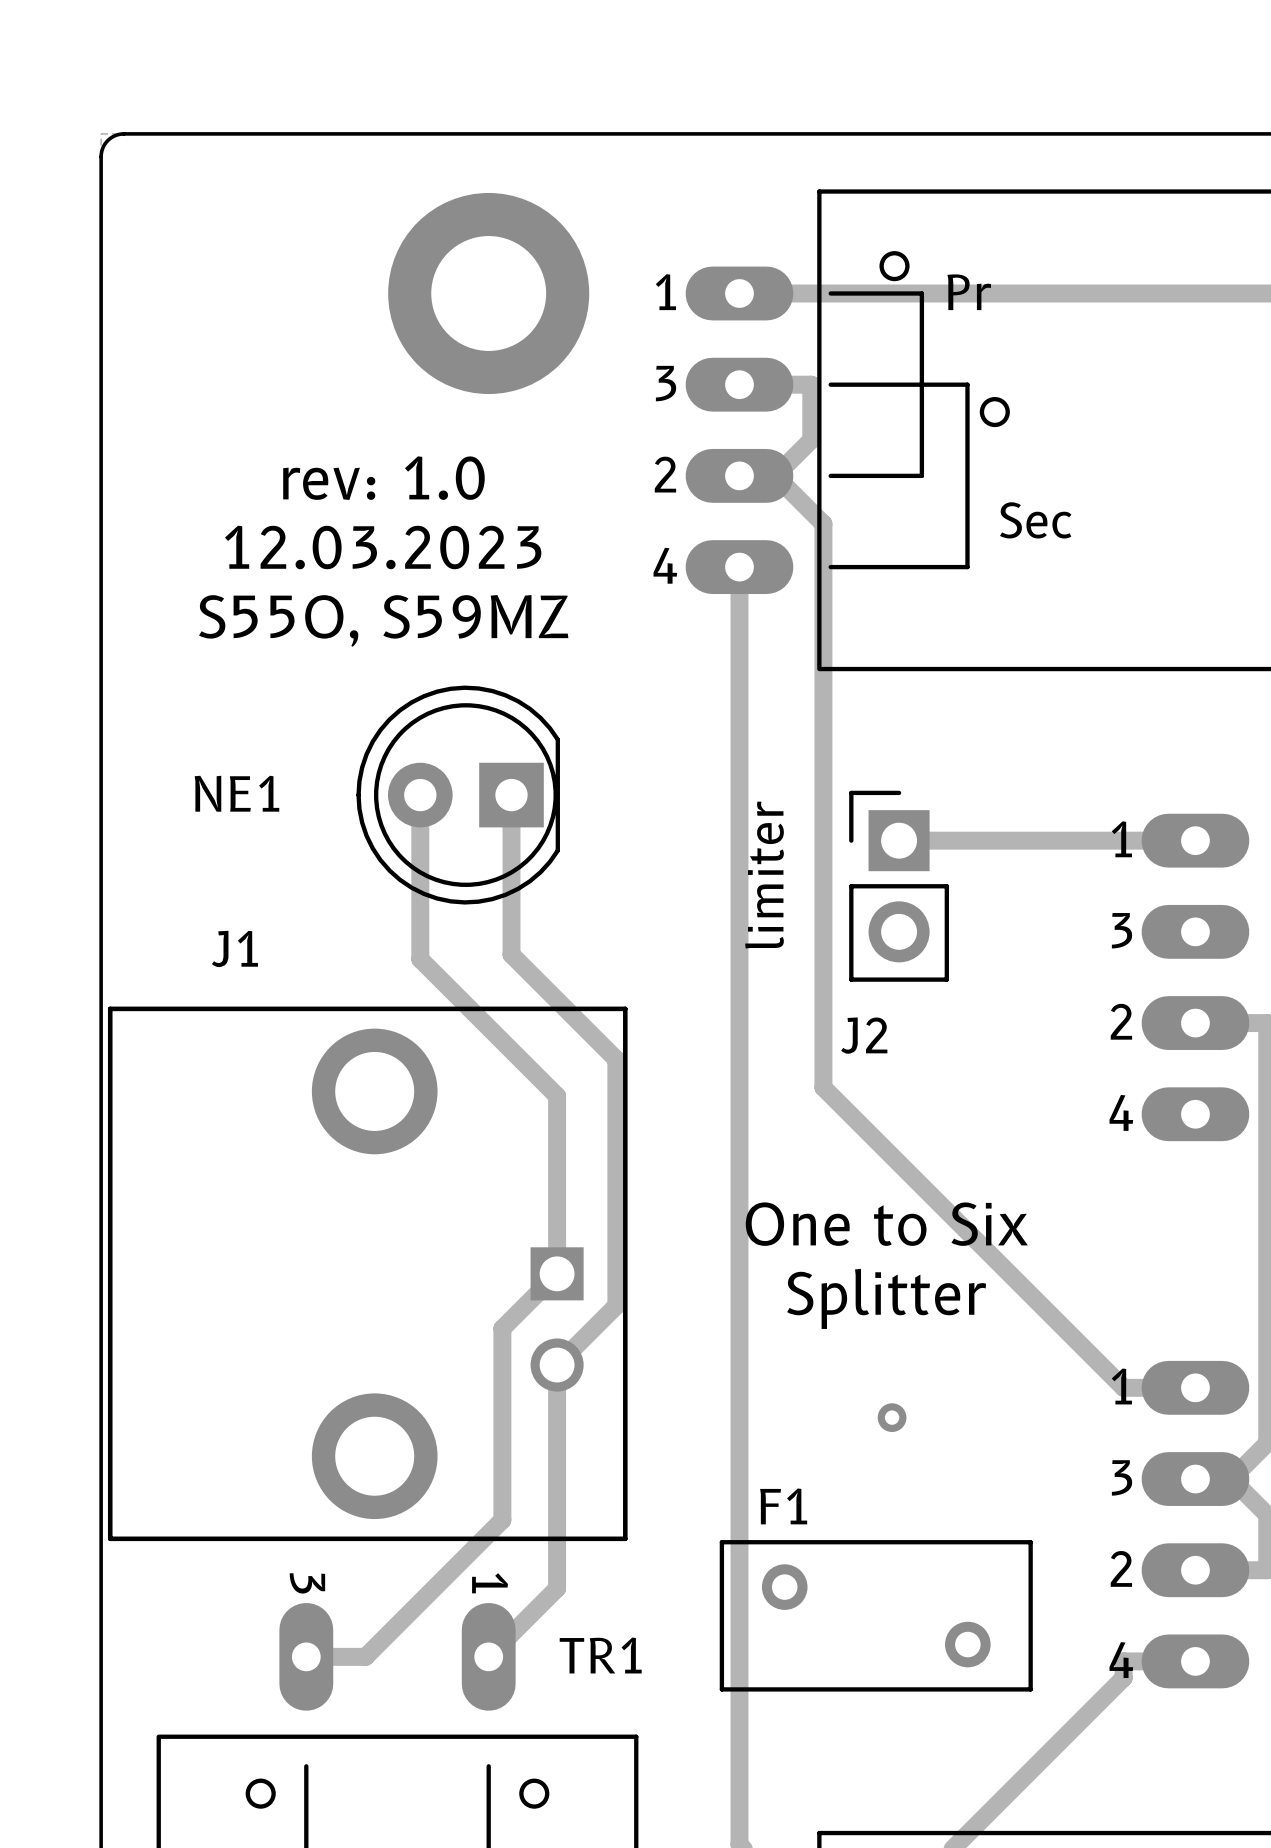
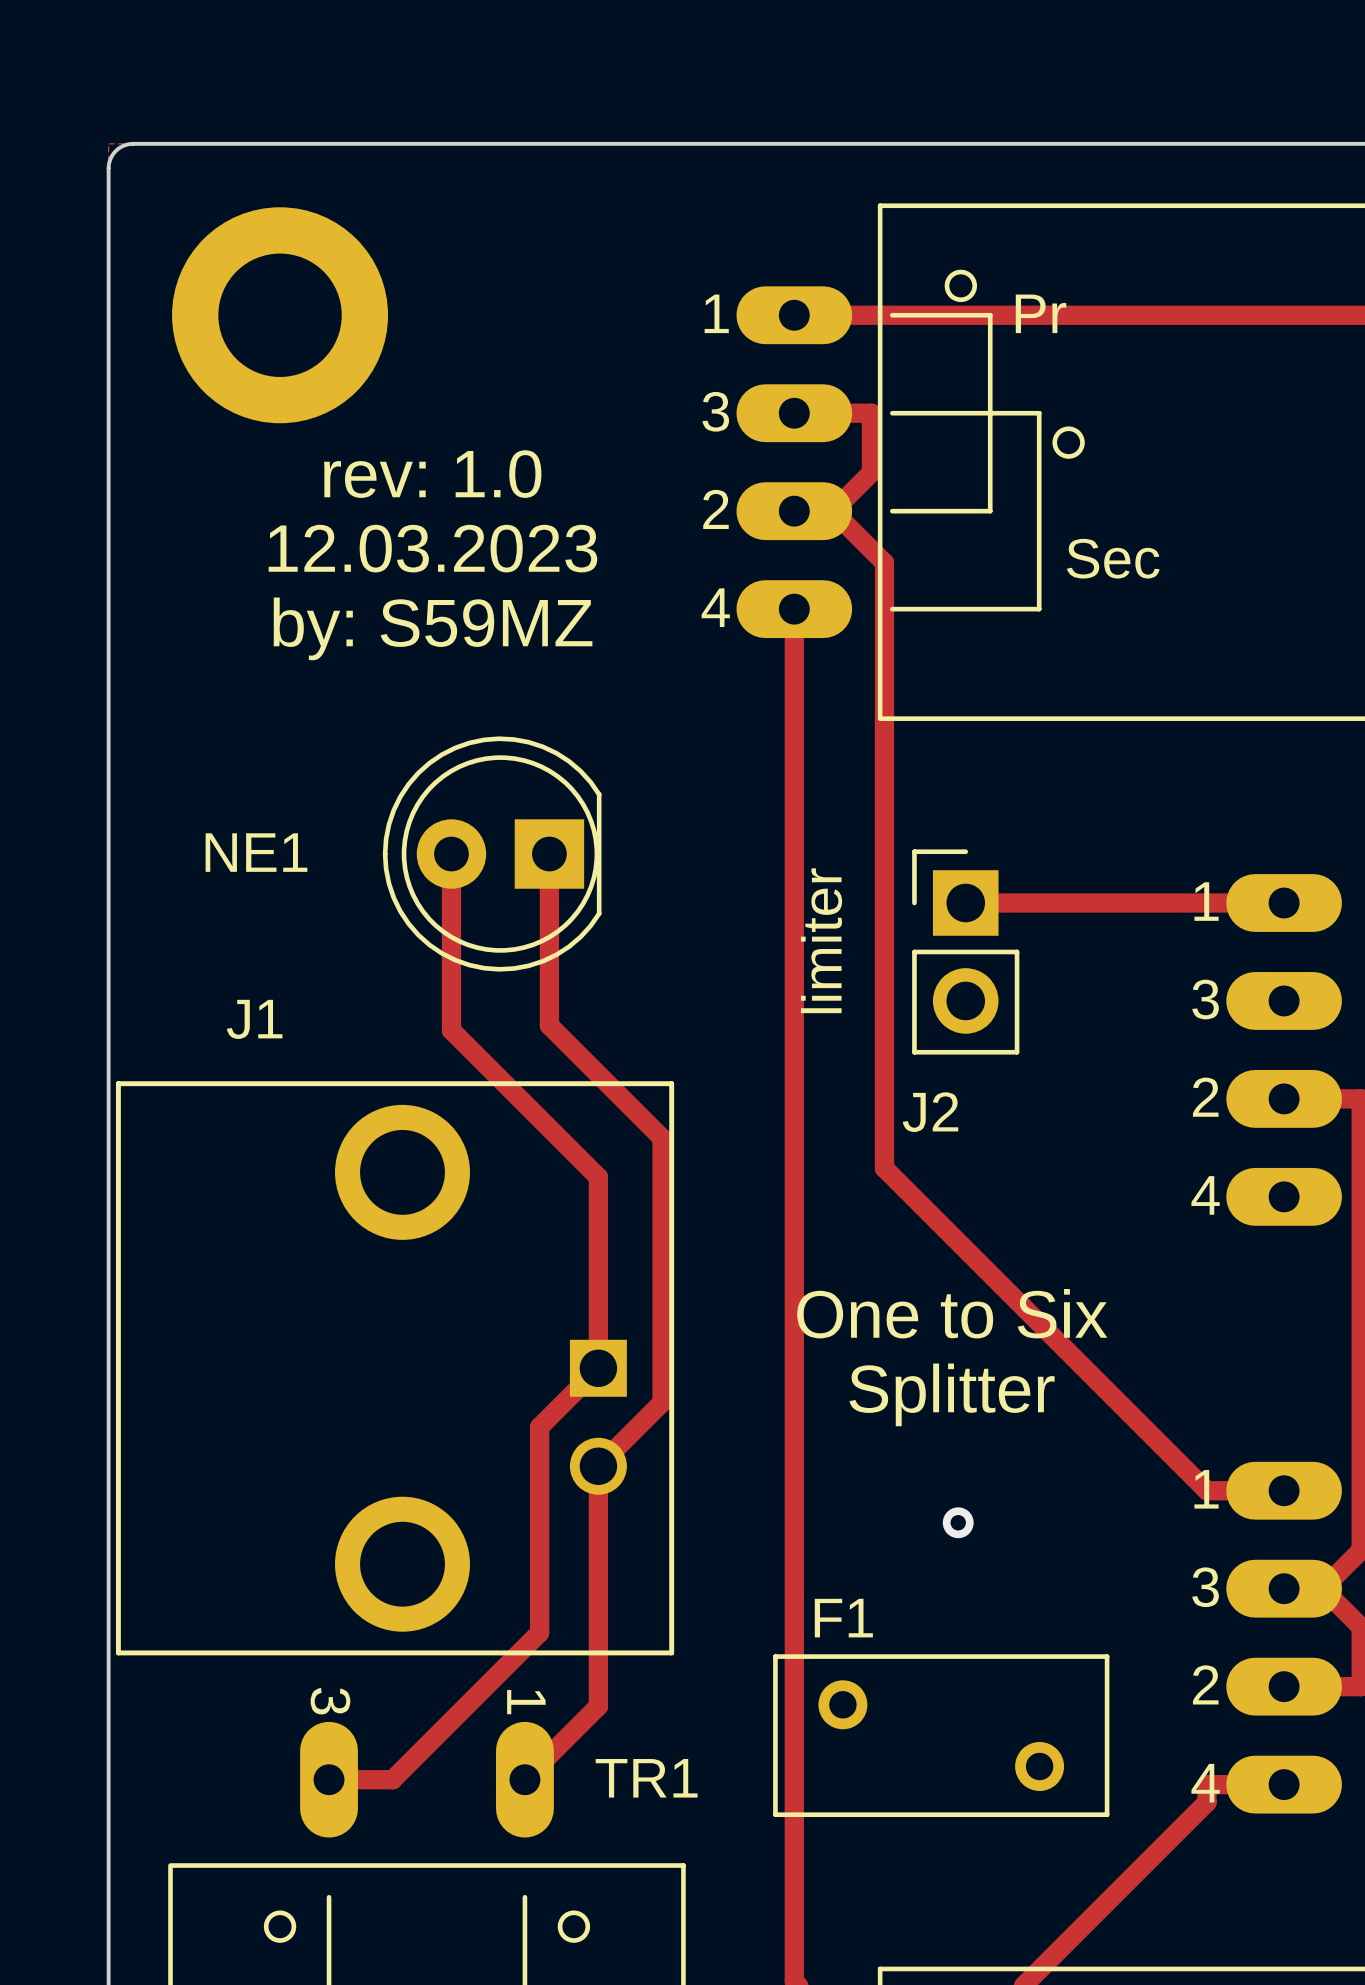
part position: (488, 293) -> (280, 315)
text position: rev: 1.0 (383, 478) -> rev: 1.0 (432, 474)
text position: 12.03.2023 (383, 547) -> 12.03.2023 (432, 548)
text: none -> by: S59MZ (432, 628)
text: S55O, S59MZ (383, 620) -> none

